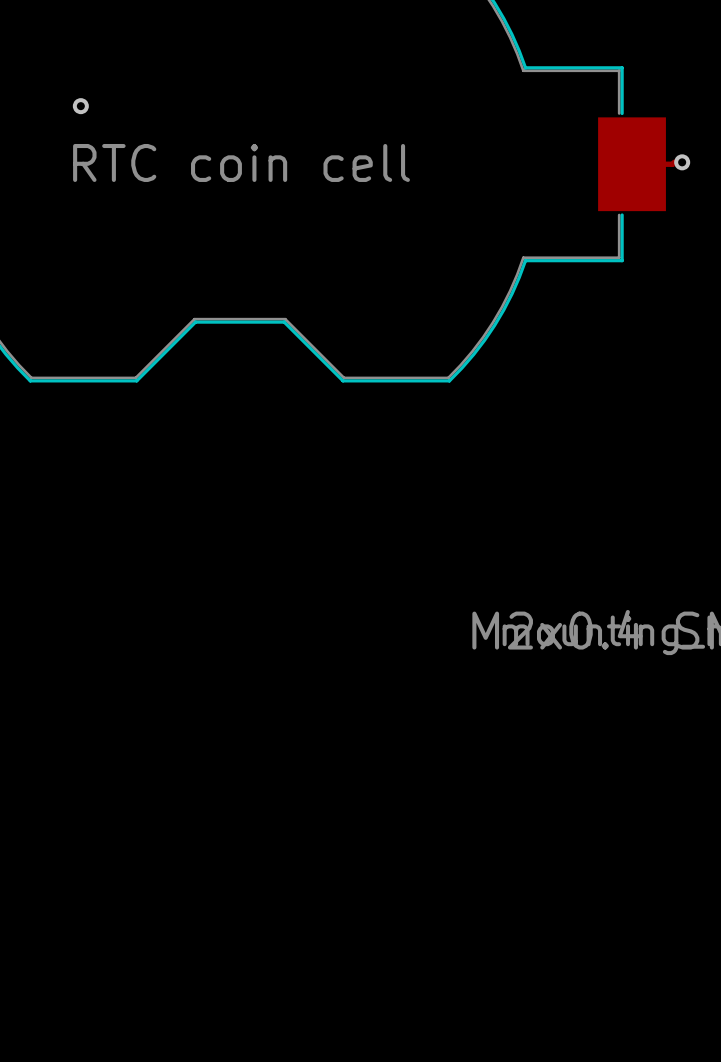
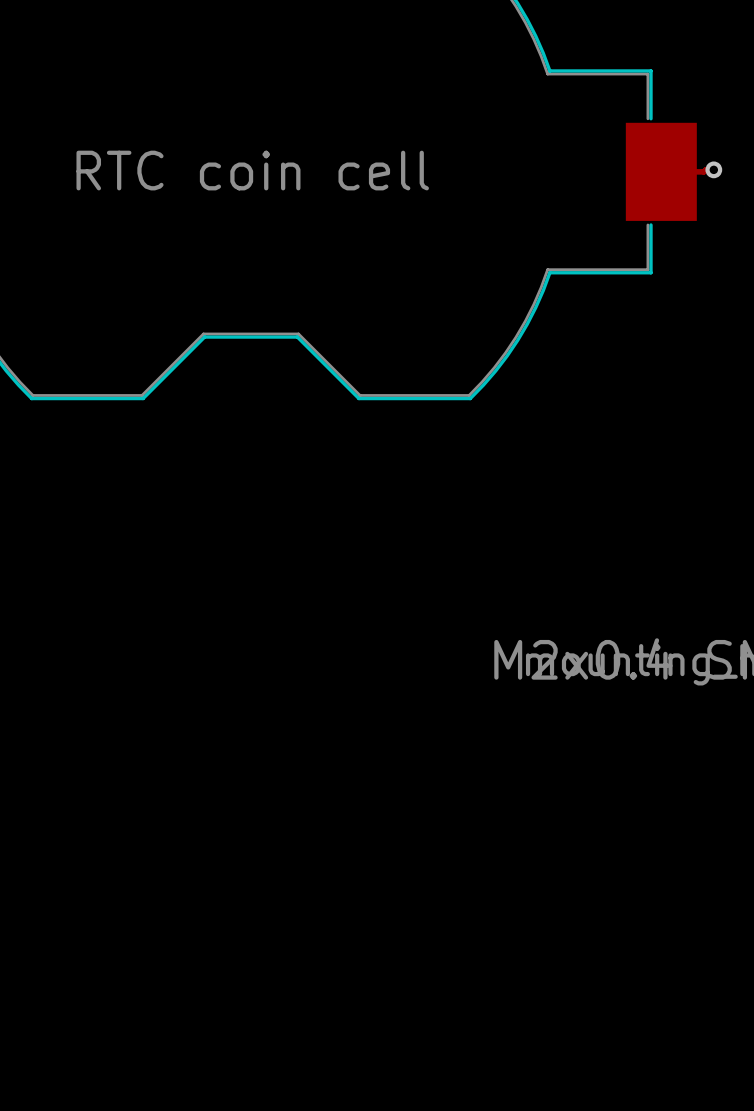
via: (80, 106) -> none

